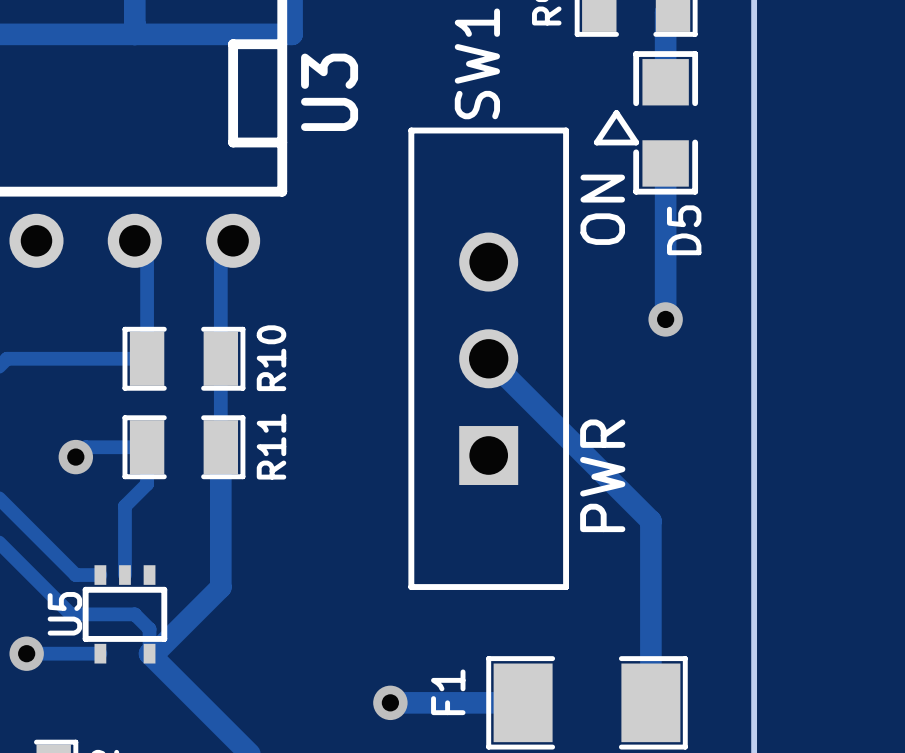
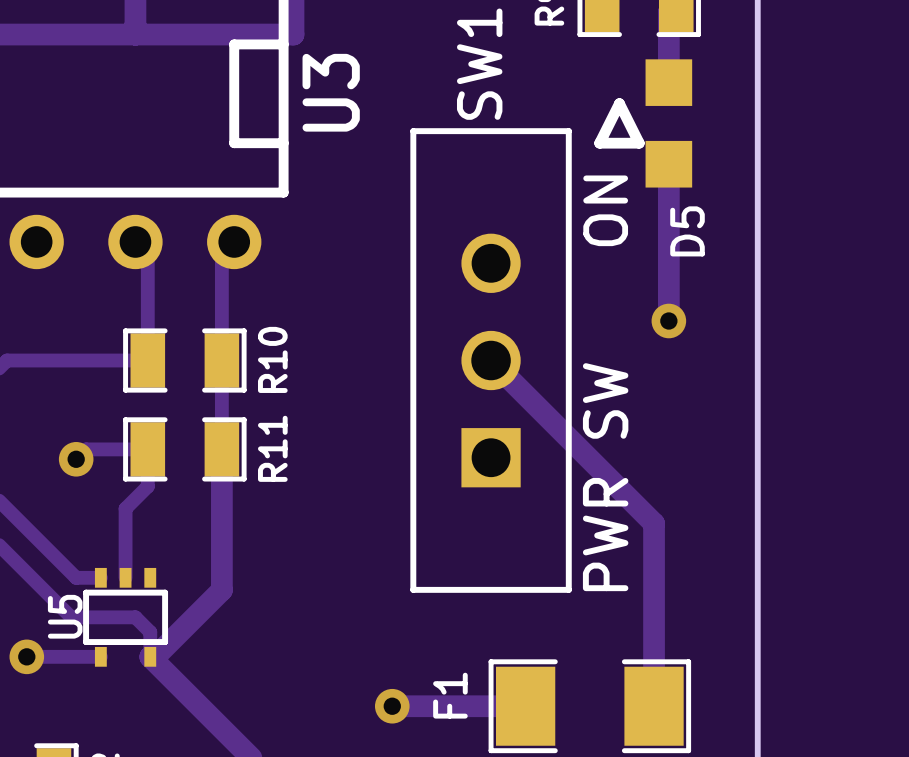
D5 footprint: [593, 51, 699, 195] -> [594, 59, 693, 188]
SW1 value: PWR (602, 475) -> PWR SW (605, 477)

